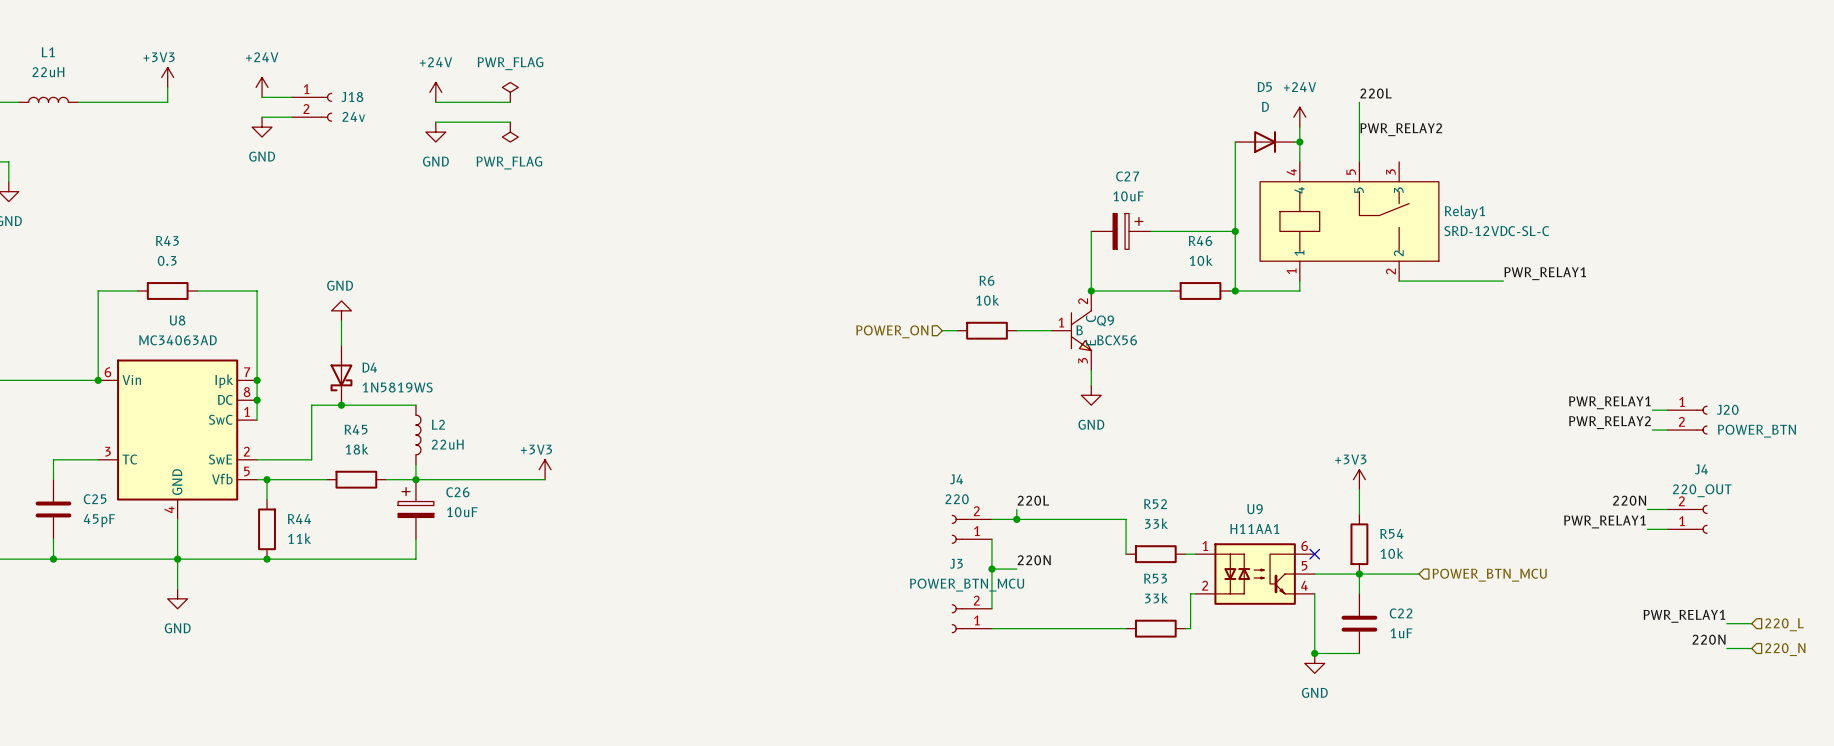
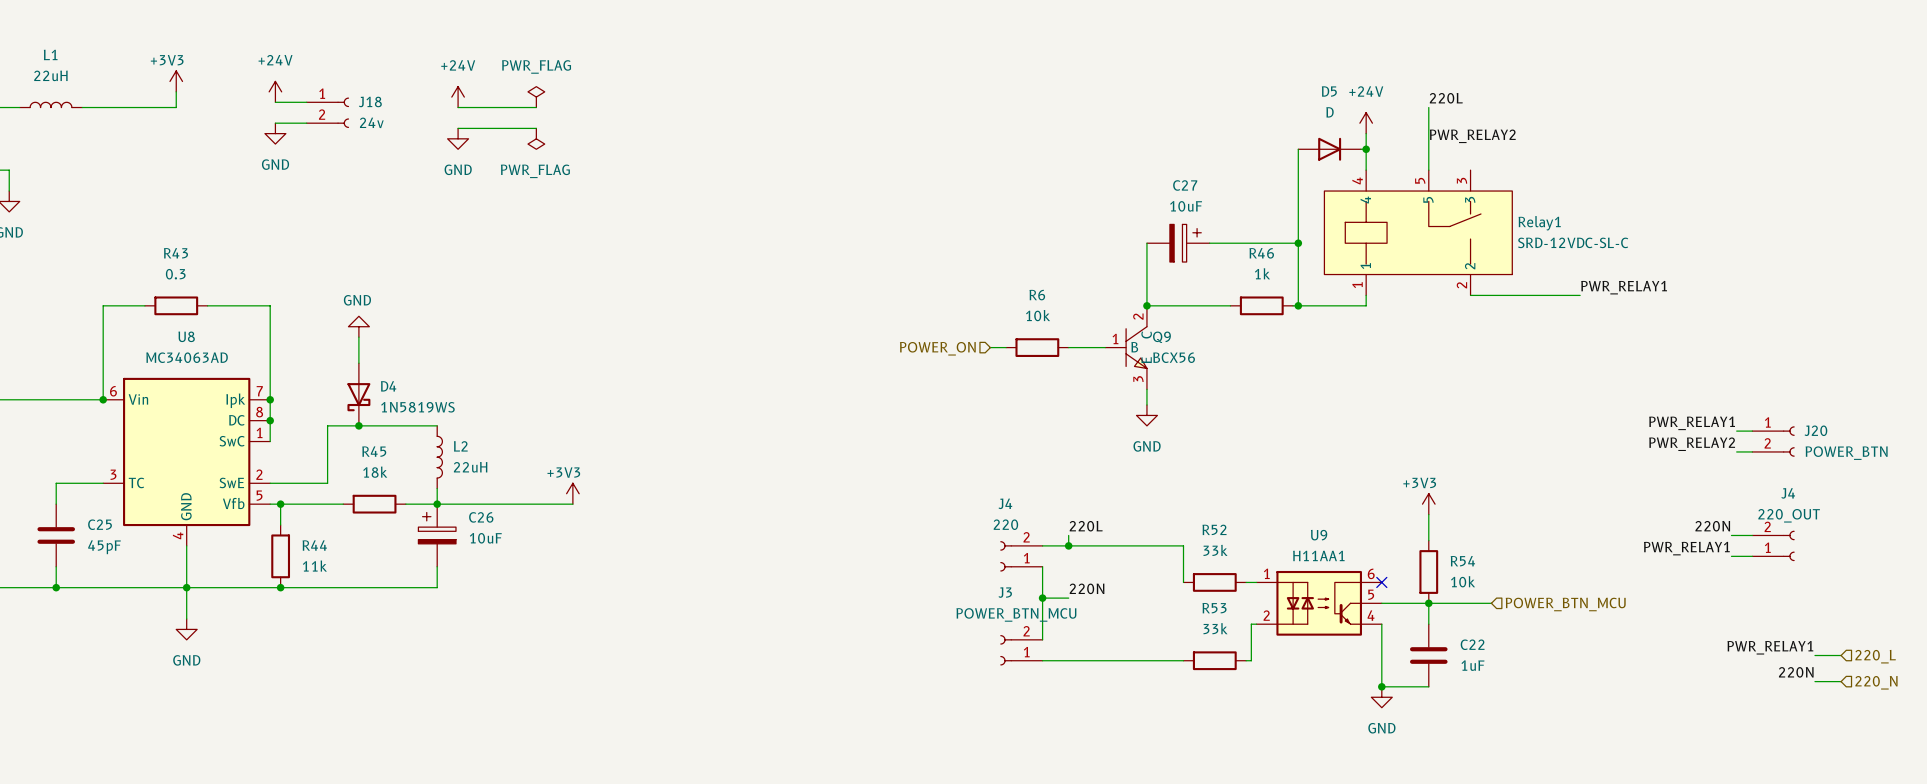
R46 value: 10k (1201, 260) -> 1k (1262, 273)

